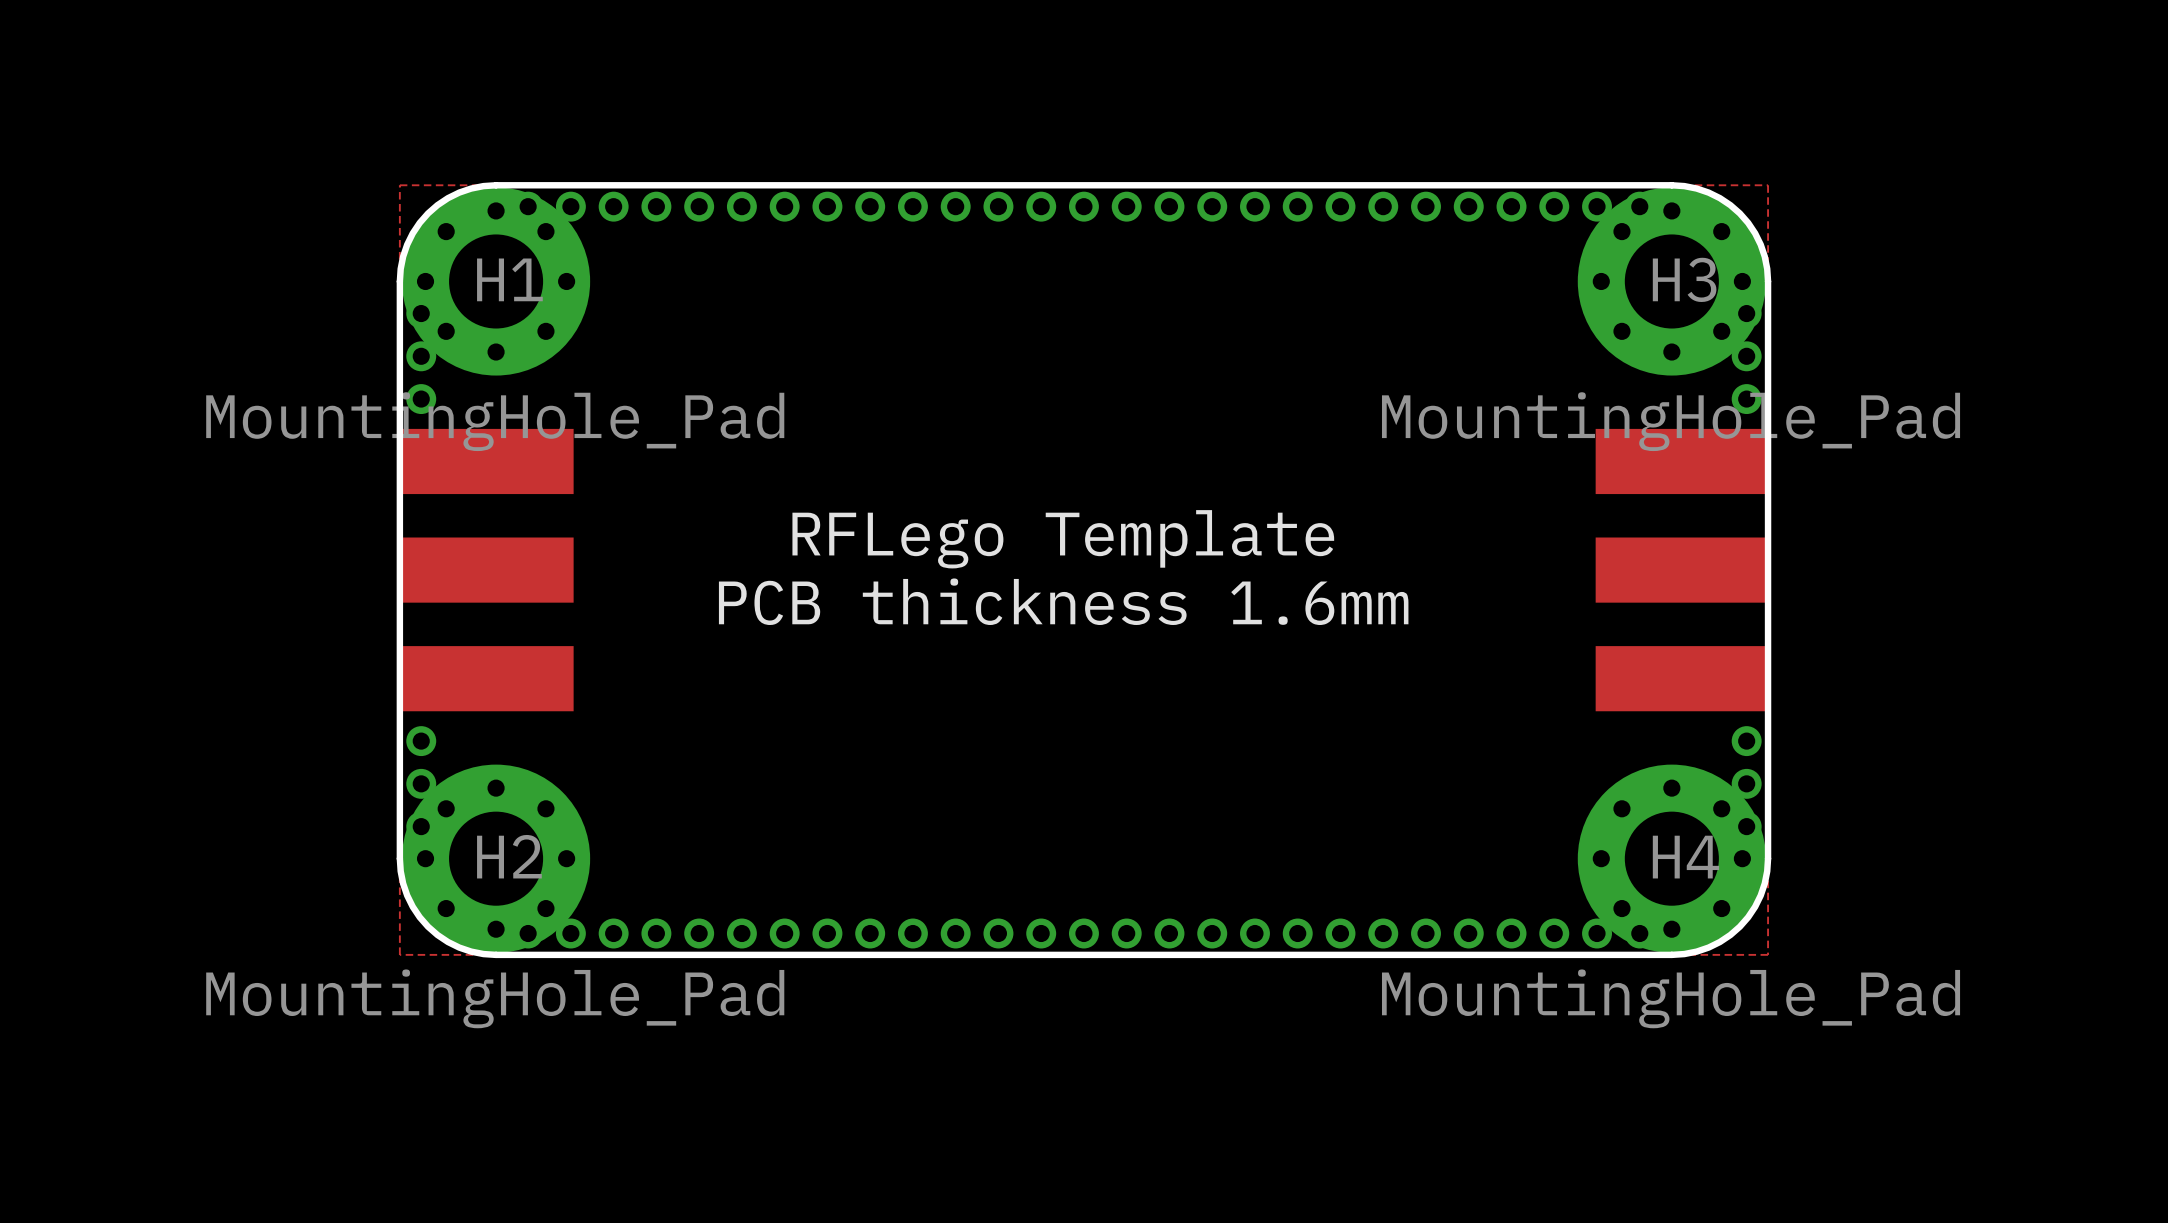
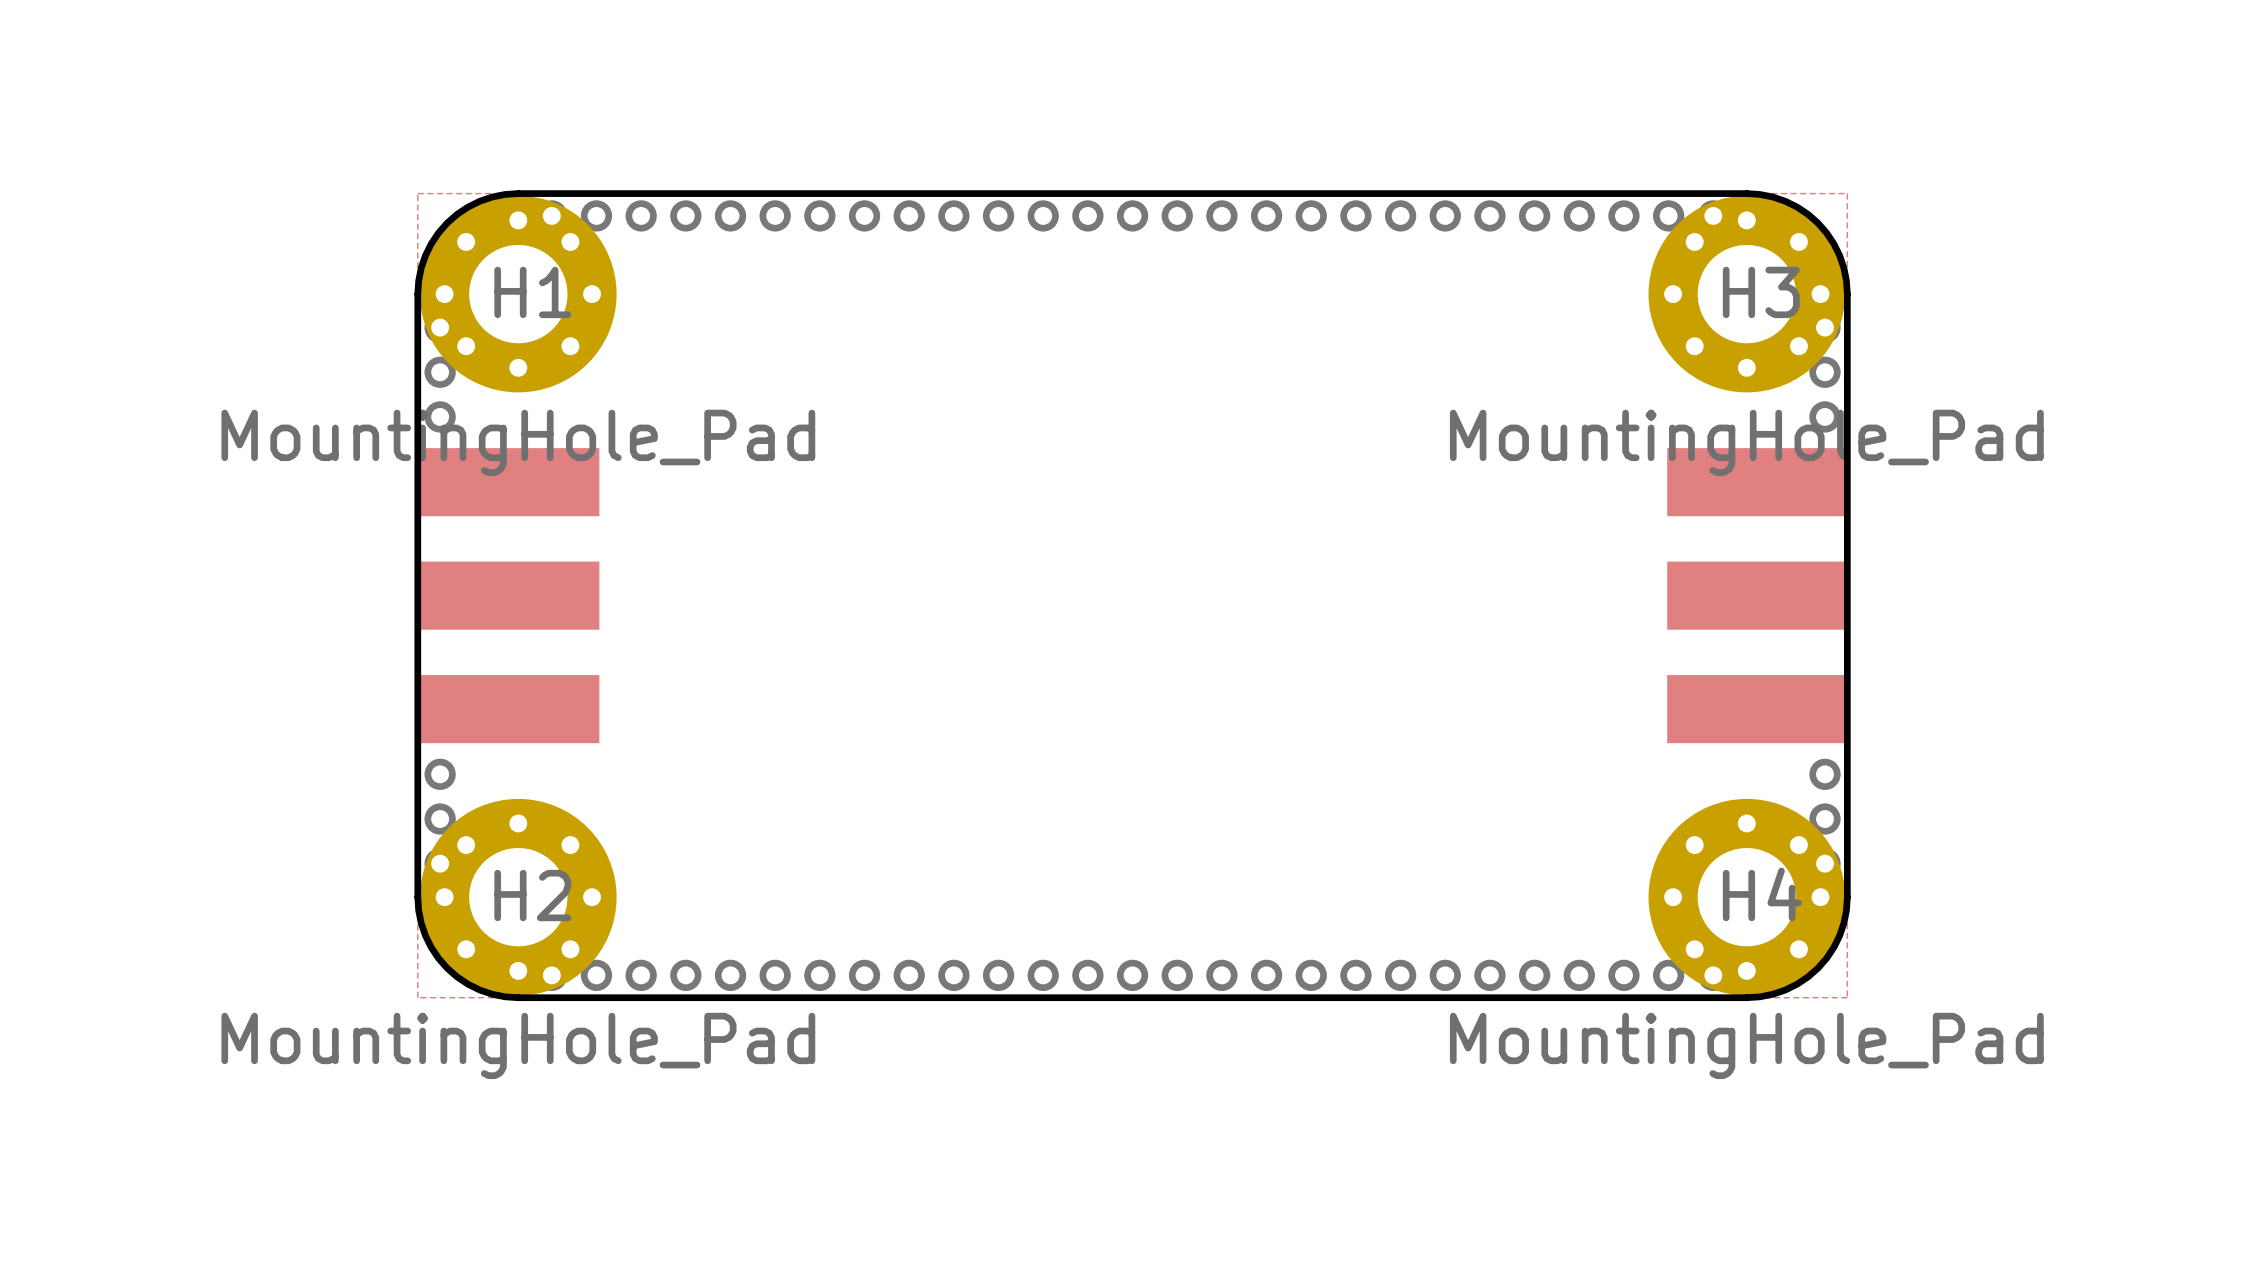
text: RFLego Template (1063, 539) -> none
text: PCB thickness 1.6mm (1063, 601) -> none

